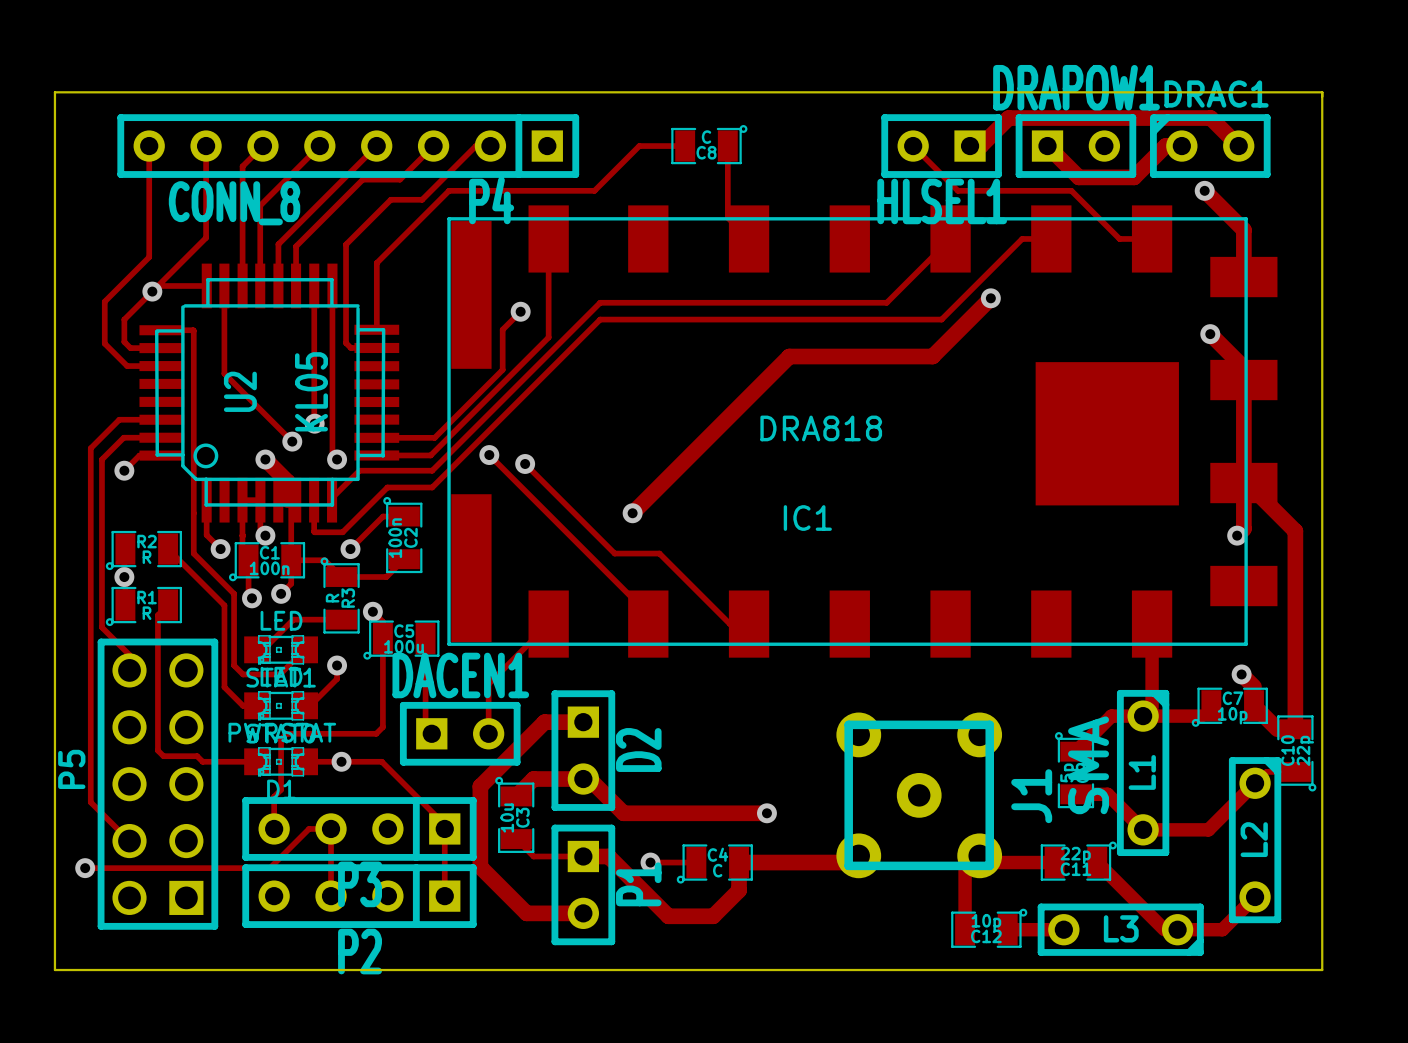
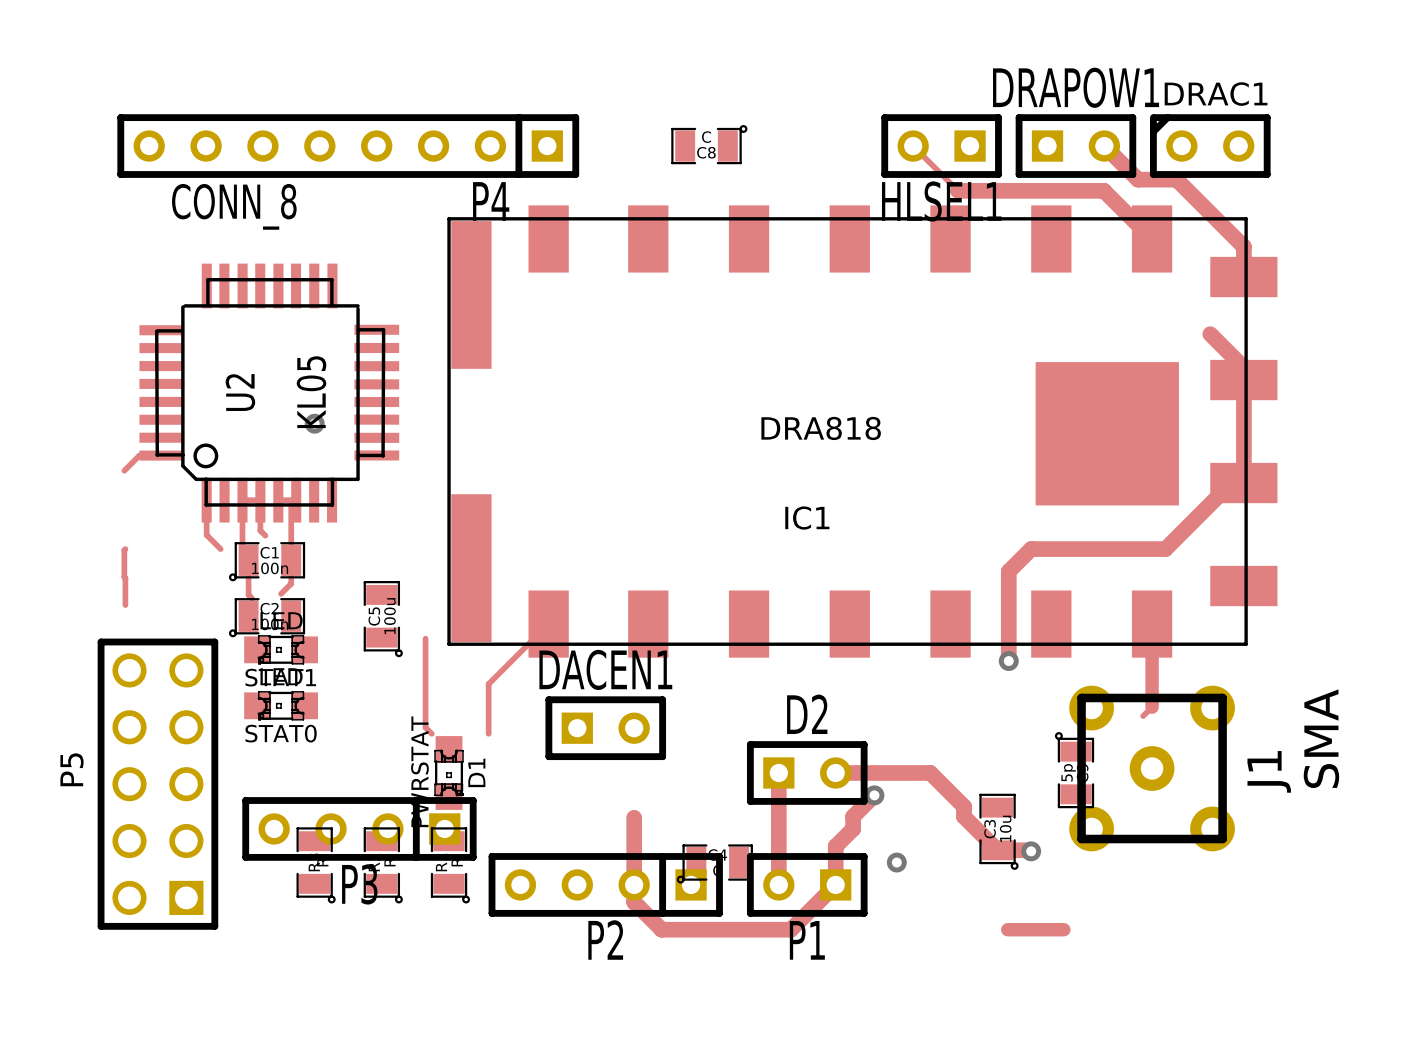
board edge: (54, 92) (1322, 92) (1322, 970) (54, 970) (54, 92) -> none
track: (149, 146) (149, 257) (104, 301) (104, 343) (127, 366) (161, 366) -> none
track: (206, 146) (206, 237) (124, 319) (124, 341) (130, 348) (161, 348) -> none
track: (262, 146) (242, 166) (242, 285) -> none
track: (319, 146) (260, 205) (260, 285) -> none
track: (376, 146) (278, 244) (278, 285) -> none
track: (433, 146) (399, 179) (362, 179) (296, 246) (296, 285) -> none
track: (490, 146) (475, 146) (422, 199) (390, 199) (346, 244) (346, 343) (350, 347) (376, 347) -> none
track: (685, 146) (639, 146) (594, 190) (449, 190) (376, 263) (376, 329) -> none
track: (727, 146) (727, 217) (749, 238) -> none
track: (970, 146) (980, 146) (1008, 118) (1210, 118) (1238, 146) -> none
track: (1047, 146) (1078, 177) (1134, 177) (1165, 146) (1181, 146) -> none
track width: thin (957, 190) (1071, 190) -> thick (957, 190) (1071, 190)
track: (1071, 190) (1119, 238) (1152, 238) -> (1071, 190) (1103, 190) (1152, 238)
track: (1204, 190) (1243, 230) (1243, 246) -> (1104, 146) (1137, 179) (1176, 179) (1243, 246)
via: (1204, 190) -> none
track: (548, 238) (548, 337) (430, 455) (376, 455) -> none
track: (950, 238) (886, 302) (600, 302) (432, 470) (359, 470) (332, 500) -> none
track: (1051, 238) (1022, 238) (941, 319) (600, 319) (432, 487) (387, 487) (342, 532) (314, 531) (314, 500) -> none
track: (157, 285) (206, 285) -> none
track: (224, 285) (224, 373) (292, 441) -> none
track: (314, 285) (314, 423) -> none
track: (332, 285) (332, 454) (337, 459) -> none
via: (152, 291) -> none
track: (990, 298) (932, 356) (789, 356) (632, 513) -> none
via: (990, 298) -> none
track: (520, 311) (502, 329) (502, 369) (434, 437) (376, 437) -> none
via: (520, 311) -> none
track: (161, 330) (193, 330) (193, 553) (234, 593) (234, 665) (243, 674) (279, 674) (304, 649) -> none
via: (1210, 334) -> none
track: (161, 419) (119, 419) (90, 448) (90, 802) (129, 841) -> none
track: (161, 437) (123, 437) (101, 459) (101, 627) (129, 654) (129, 670) -> none
via: (292, 441) -> none
track: (489, 455) (648, 614) (648, 624) -> none
via: (489, 455) -> none
track: (265, 459) (287, 481) (287, 500) -> none
via: (265, 459) -> none
via: (337, 459) -> none
track: (525, 463) (614, 553) (659, 553) (730, 624) (749, 624) -> none
via: (525, 463) -> none
via: (124, 470) -> none
track: none -> (1243, 483) (1231, 483) (1165, 549) (1031, 549) (1008, 571) (1008, 661)
via: (632, 513) -> none
track: (404, 516) (383, 516) (350, 549) -> none
via: (265, 535) -> none
C2 rotation: 0° (402, 535) -> 90° counterclockwise (267, 617)
C2 position: (402, 535) -> (267, 617)
track: (1237, 535) (1243, 528) (1243, 483) (1247, 483) (1295, 531) (1295, 729) (1277, 729) (1254, 705) (1254, 686) (1241, 674) -> none
via: (1237, 535) -> none
track: (168, 549) (224, 605) (224, 687) (243, 705) (257, 705) -> none
via: (220, 549) -> none
via: (350, 549) -> none
R2 rotation: 0° (143, 550) -> 90° counterclockwise (383, 865)
R2 position: (143, 550) -> (383, 865)
track: (404, 559) (386, 577) (341, 577) (324, 560) (291, 560) -> none
via: (124, 577) -> none
via: (281, 593) -> none
R3 rotation: 0° (340, 595) -> 180° (316, 865)
R3 position: (340, 595) -> (316, 865)
via: (251, 598) -> none
track: (168, 605) (157, 615) (157, 750) (163, 756) (197, 756) (202, 761) (257, 761) -> none
R1 rotation: 0° (143, 606) -> 90° counterclockwise (450, 865)
R1 position: (143, 606) -> (450, 865)
track: (372, 611) (382, 621) (382, 727) (376, 733) (286, 733) (281, 739) (281, 789) (274, 796) (274, 828) -> none
via: (372, 611) -> none
track: (341, 619) (293, 619) (263, 649) (257, 649) -> none
C5 rotation: 0° (401, 640) -> 90° counterclockwise (383, 619)
via: none -> (1008, 661)
track: (337, 665) (337, 678) (310, 705) (304, 705) -> none
via: (337, 665) -> none
via: (1241, 674) -> none
track: (1211, 705) (1201, 716) (1111, 716) (1075, 751) -> none
C7: 10p (1229, 707) -> none
track: (583, 722) (544, 722) (480, 786) (480, 867) (526, 913) (583, 913) -> none
DACEN1 position: (460, 733) -> (605, 728)
D2 rotation: 0° (583, 750) -> 90° counterclockwise (807, 772)
D2 position: (583, 750) -> (807, 772)
C10: 22p (1296, 753) -> none
D1 rotation: 0° (281, 761) -> 90° counterclockwise (449, 772)
D1 position: (281, 761) -> (449, 772)
track: (304, 761) (381, 761) (444, 824) (444, 896) -> none
via: (341, 761) -> none
track: (1295, 771) (1266, 771) (1208, 829) (1143, 829) (1107, 794) (1075, 794) -> none
track: none -> (778, 772) (778, 884)
track: none -> (835, 772) (930, 772) (963, 806) (963, 816) (997, 850) (1031, 851)
L1: (1143, 772) -> none
track: none -> (874, 795) (853, 816) (853, 828) (835, 846) (835, 884) (790, 929) (661, 929) (634, 902) (634, 817)
via: none -> (874, 795)
J1 position: (919, 795) -> (1152, 768)
track: (516, 796) (533, 779) (589, 779) (623, 813) (766, 813) -> none
via: (766, 813) -> none
C3 rotation: 0° (514, 814) -> 180° (999, 831)
C3 position: (514, 814) -> (999, 831)
track: (516, 839) (533, 856) (608, 856) (668, 916) (713, 916) (739, 890) (739, 862) (852, 862) (858, 855) -> none
L2: (1255, 840) -> none
via: none -> (1031, 851)
C11: 22p (1078, 861) -> none
track: (650, 862) (696, 862) -> none
via: (650, 862) -> none
via: none -> (896, 862)
track: (1054, 862) (986, 862) (979, 855) (965, 870) (965, 929) -> none
track: (1097, 862) (1164, 929) (1222, 929) (1255, 897) -> none
track: (85, 868) (269, 868) (309, 828) (331, 828) (331, 896) -> none
via: (85, 868) -> none
P1 rotation: 0° (583, 884) -> 90° clockwise (807, 884)
P1 position: (583, 884) -> (807, 884)
P2 position: (359, 896) -> (605, 884)
C12: 10p (989, 928) -> none
L3: (1120, 929) -> none

